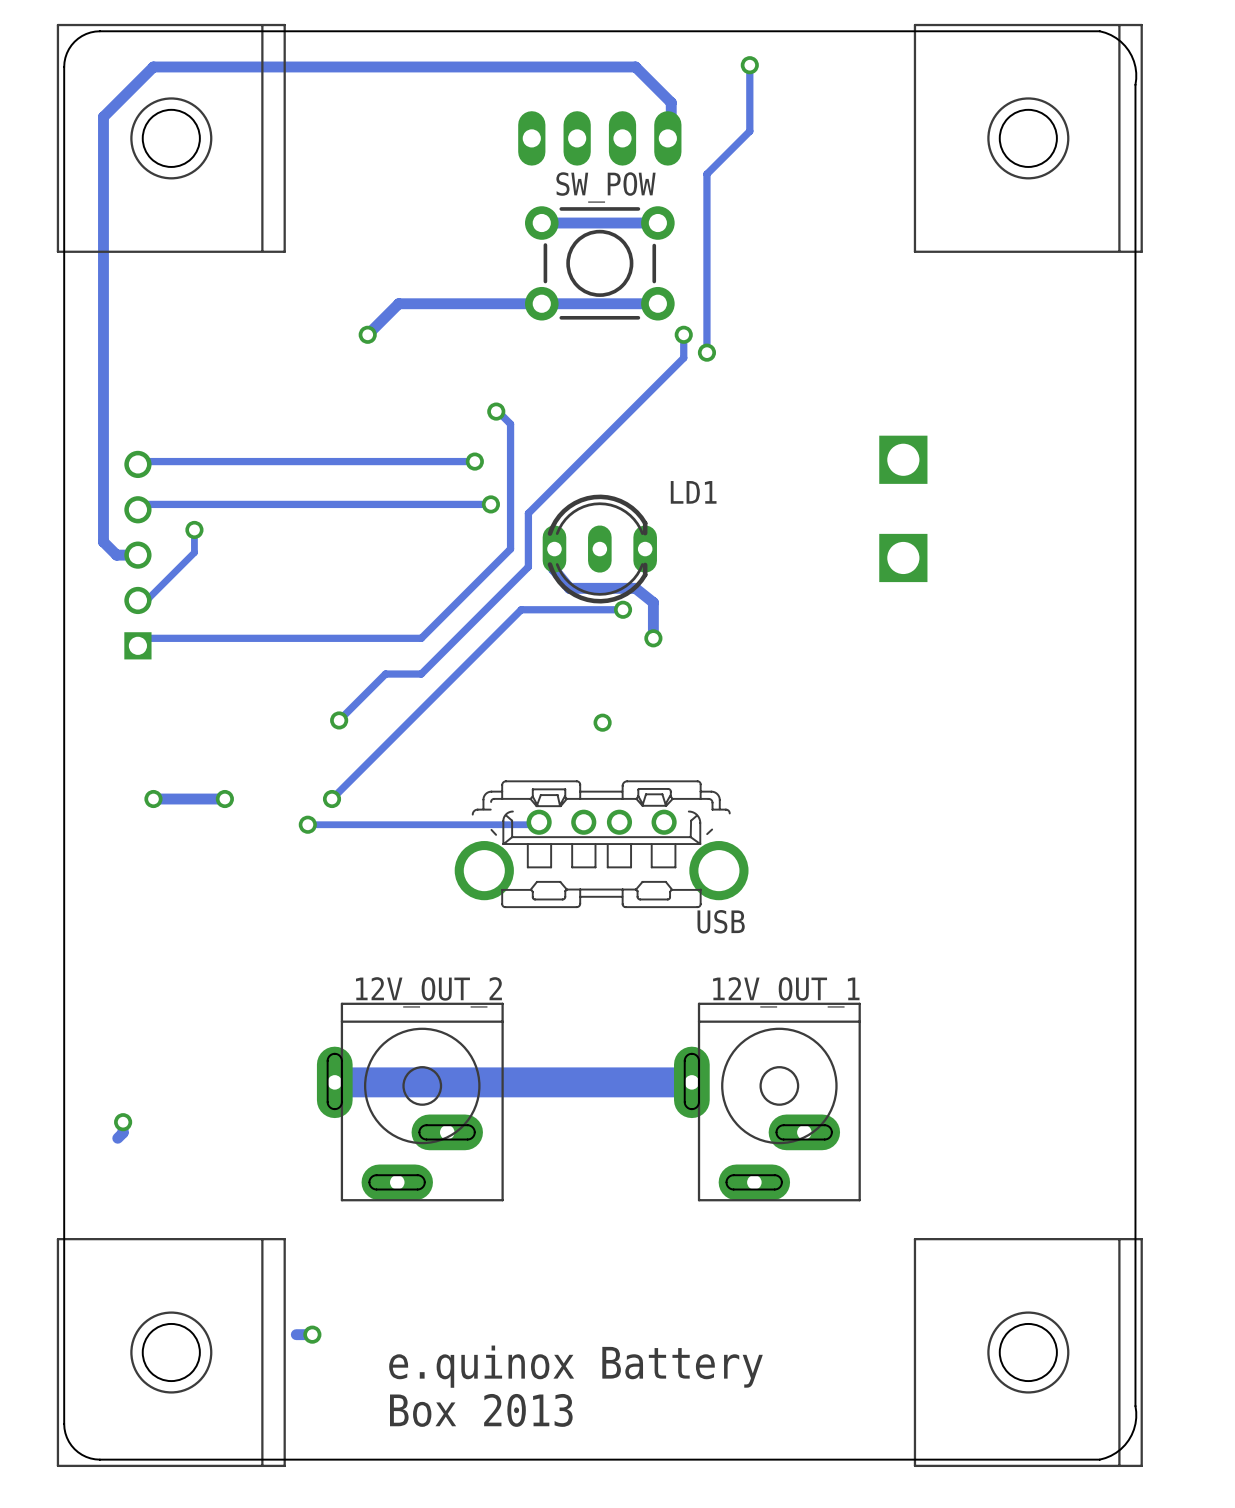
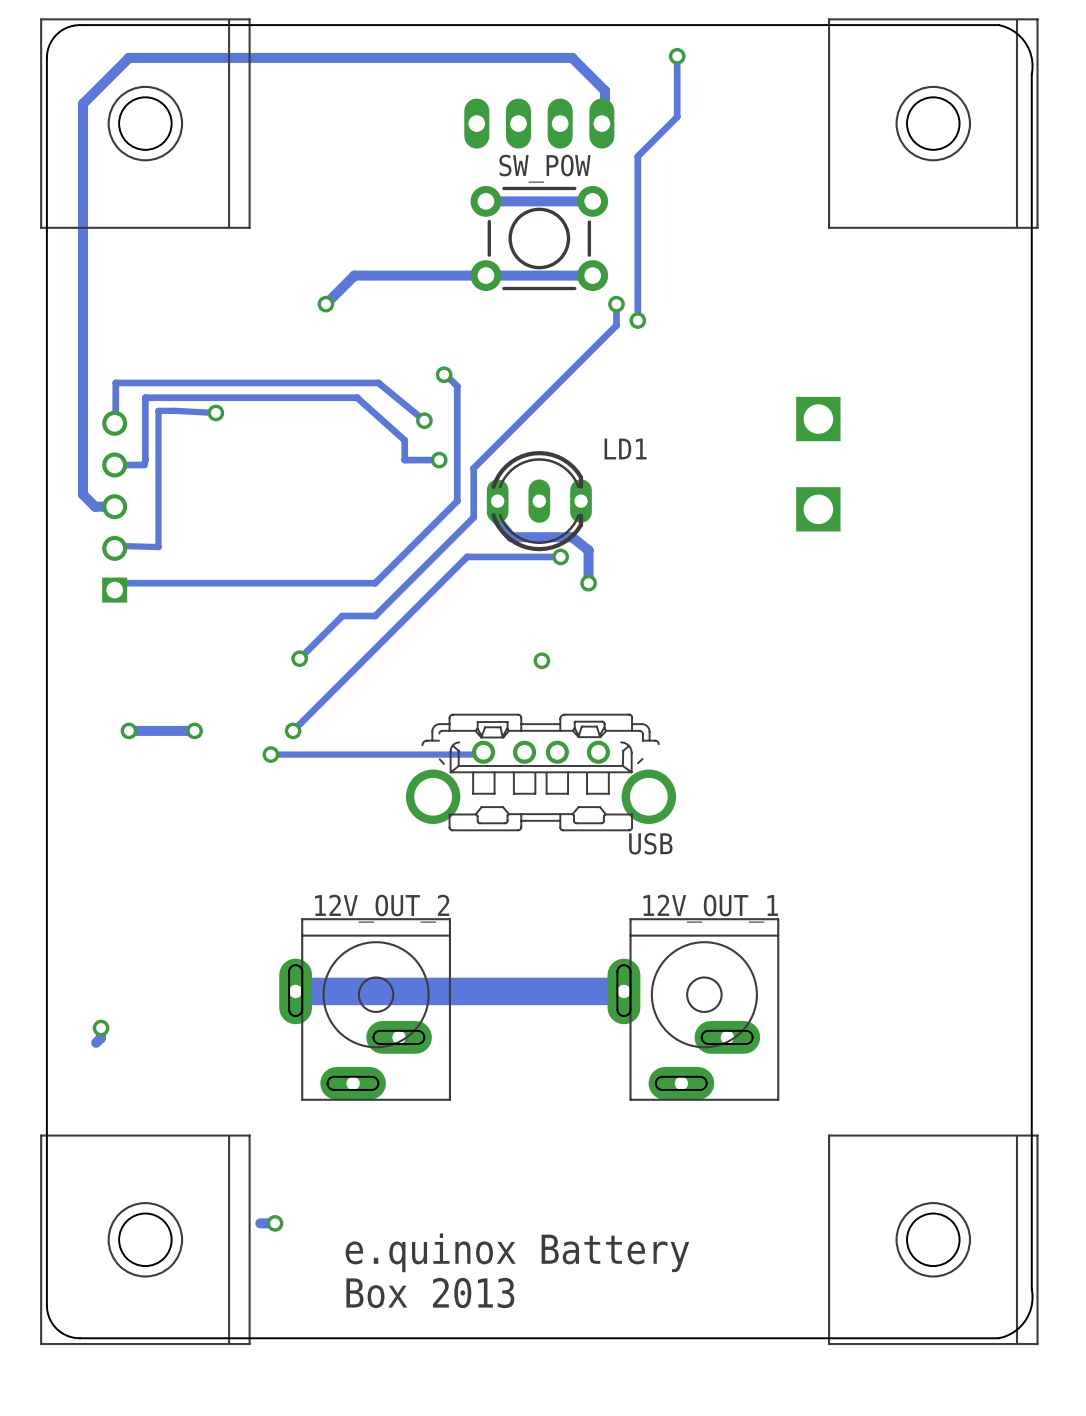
track: (474, 461) (140, 461) (137, 464) -> (424, 420) (378, 382) (115, 382) (114, 423)
track: (453, 504) (143, 504) (137, 509) -> (404, 460) (404, 440) (357, 397) (145, 397) (144, 465) (114, 465)
track: (194, 529) (194, 552) (149, 597) -> (215, 412) (158, 410) (158, 547) (124, 546)
via position: (194, 529) -> (215, 412)

